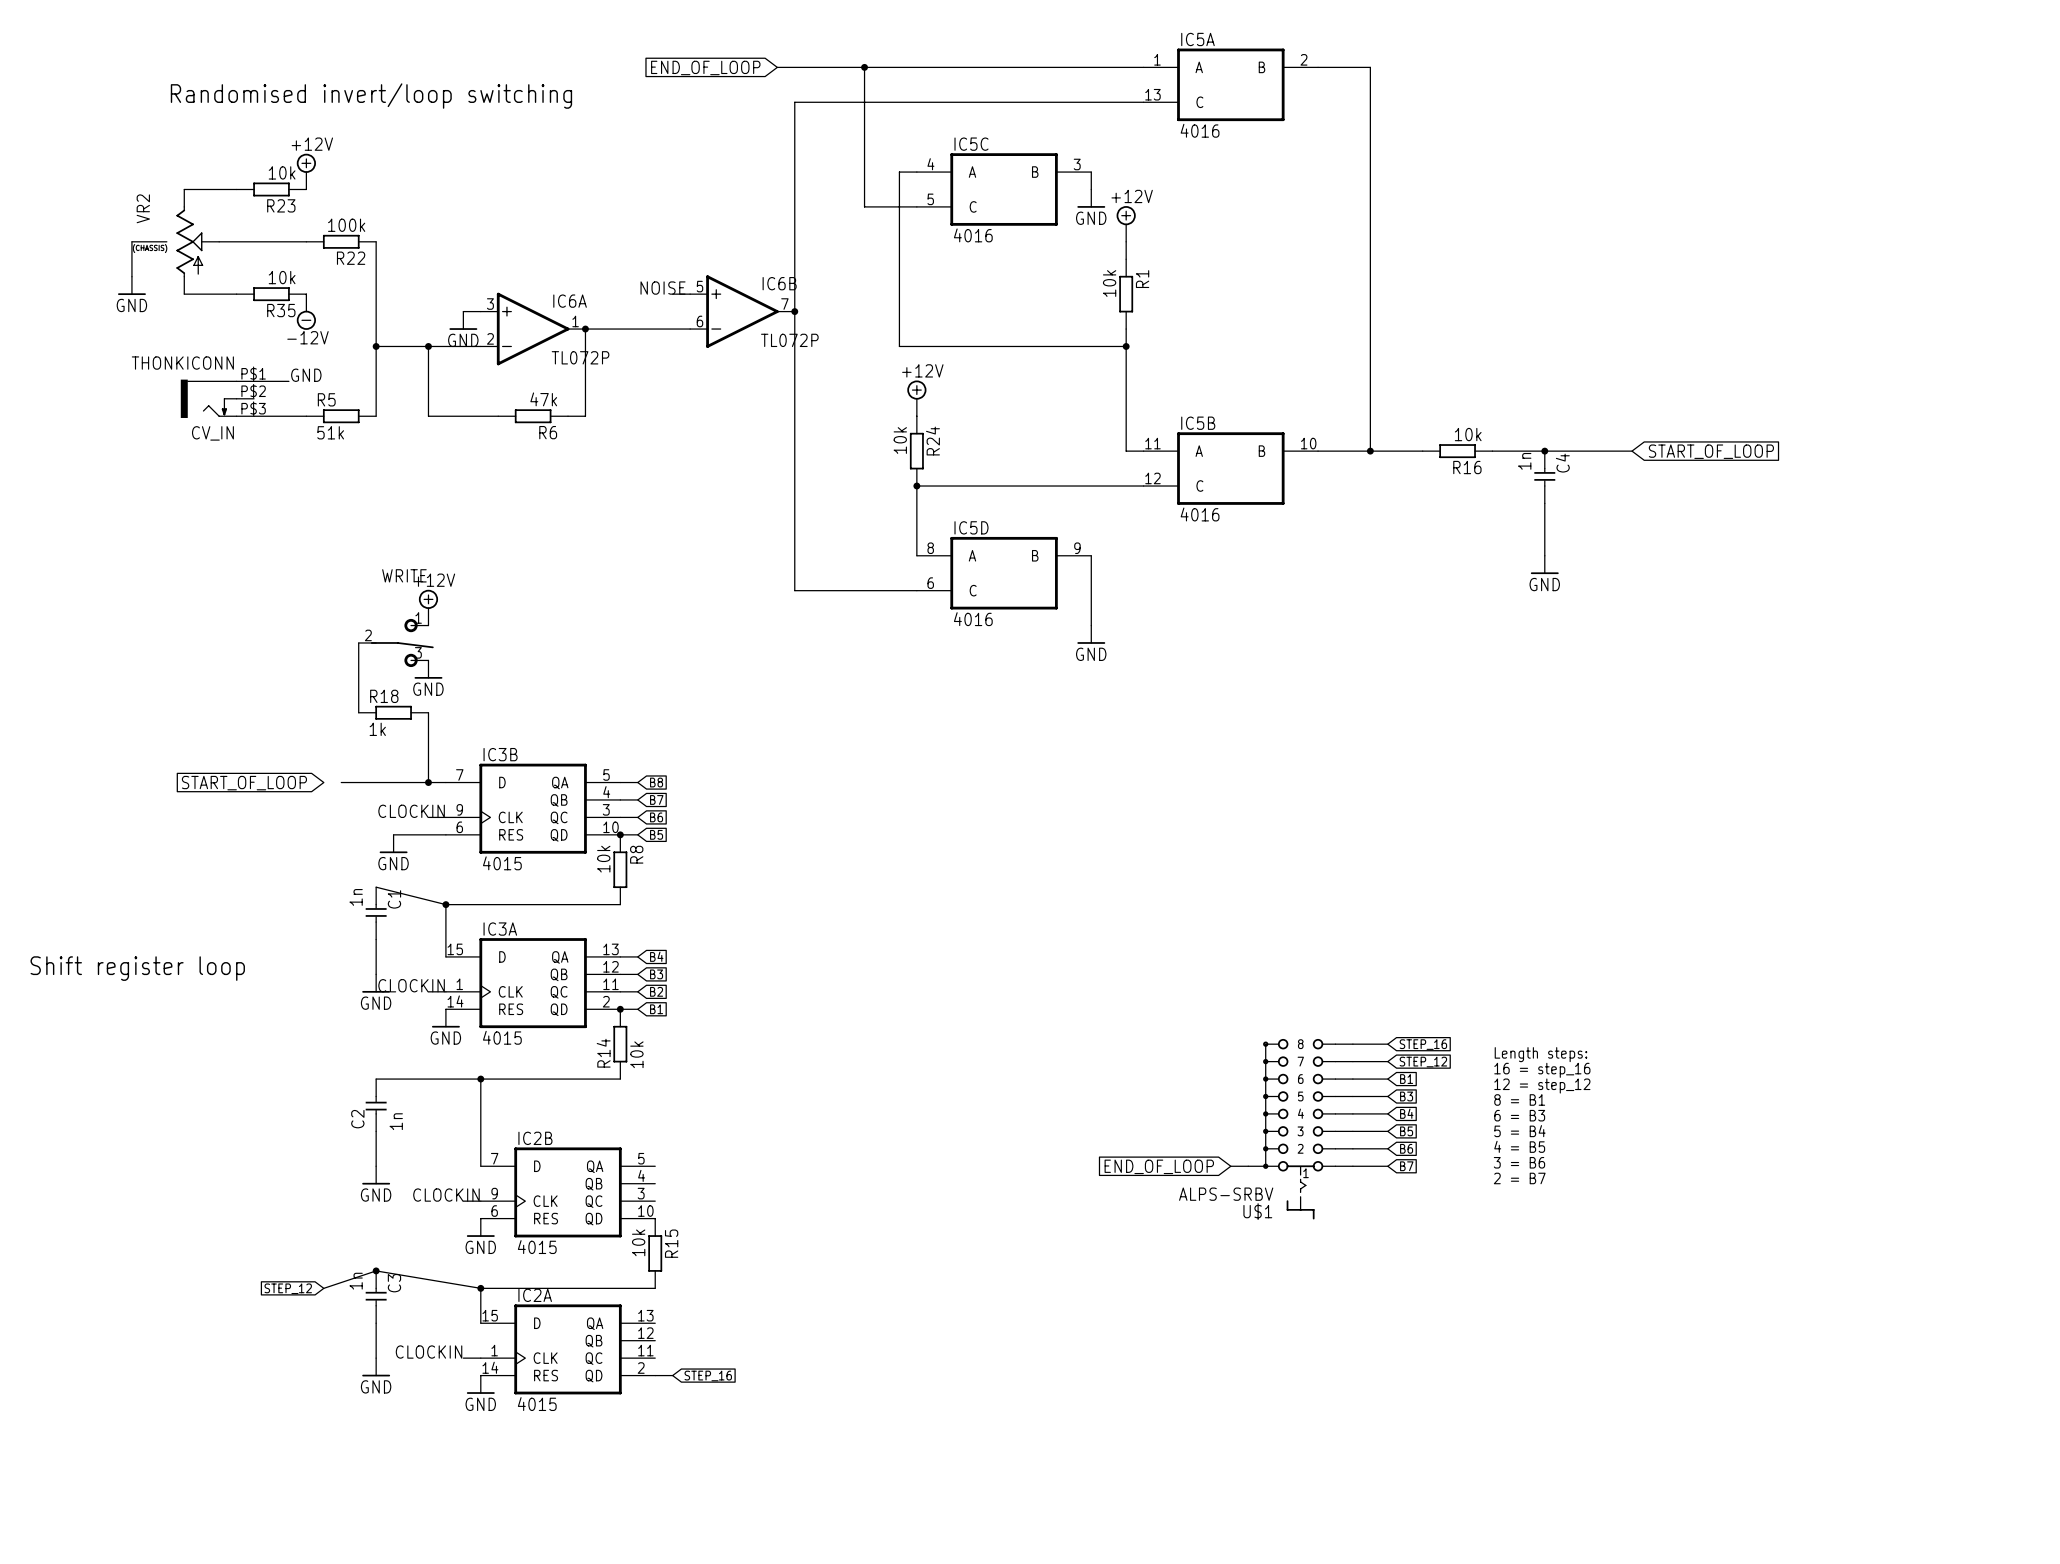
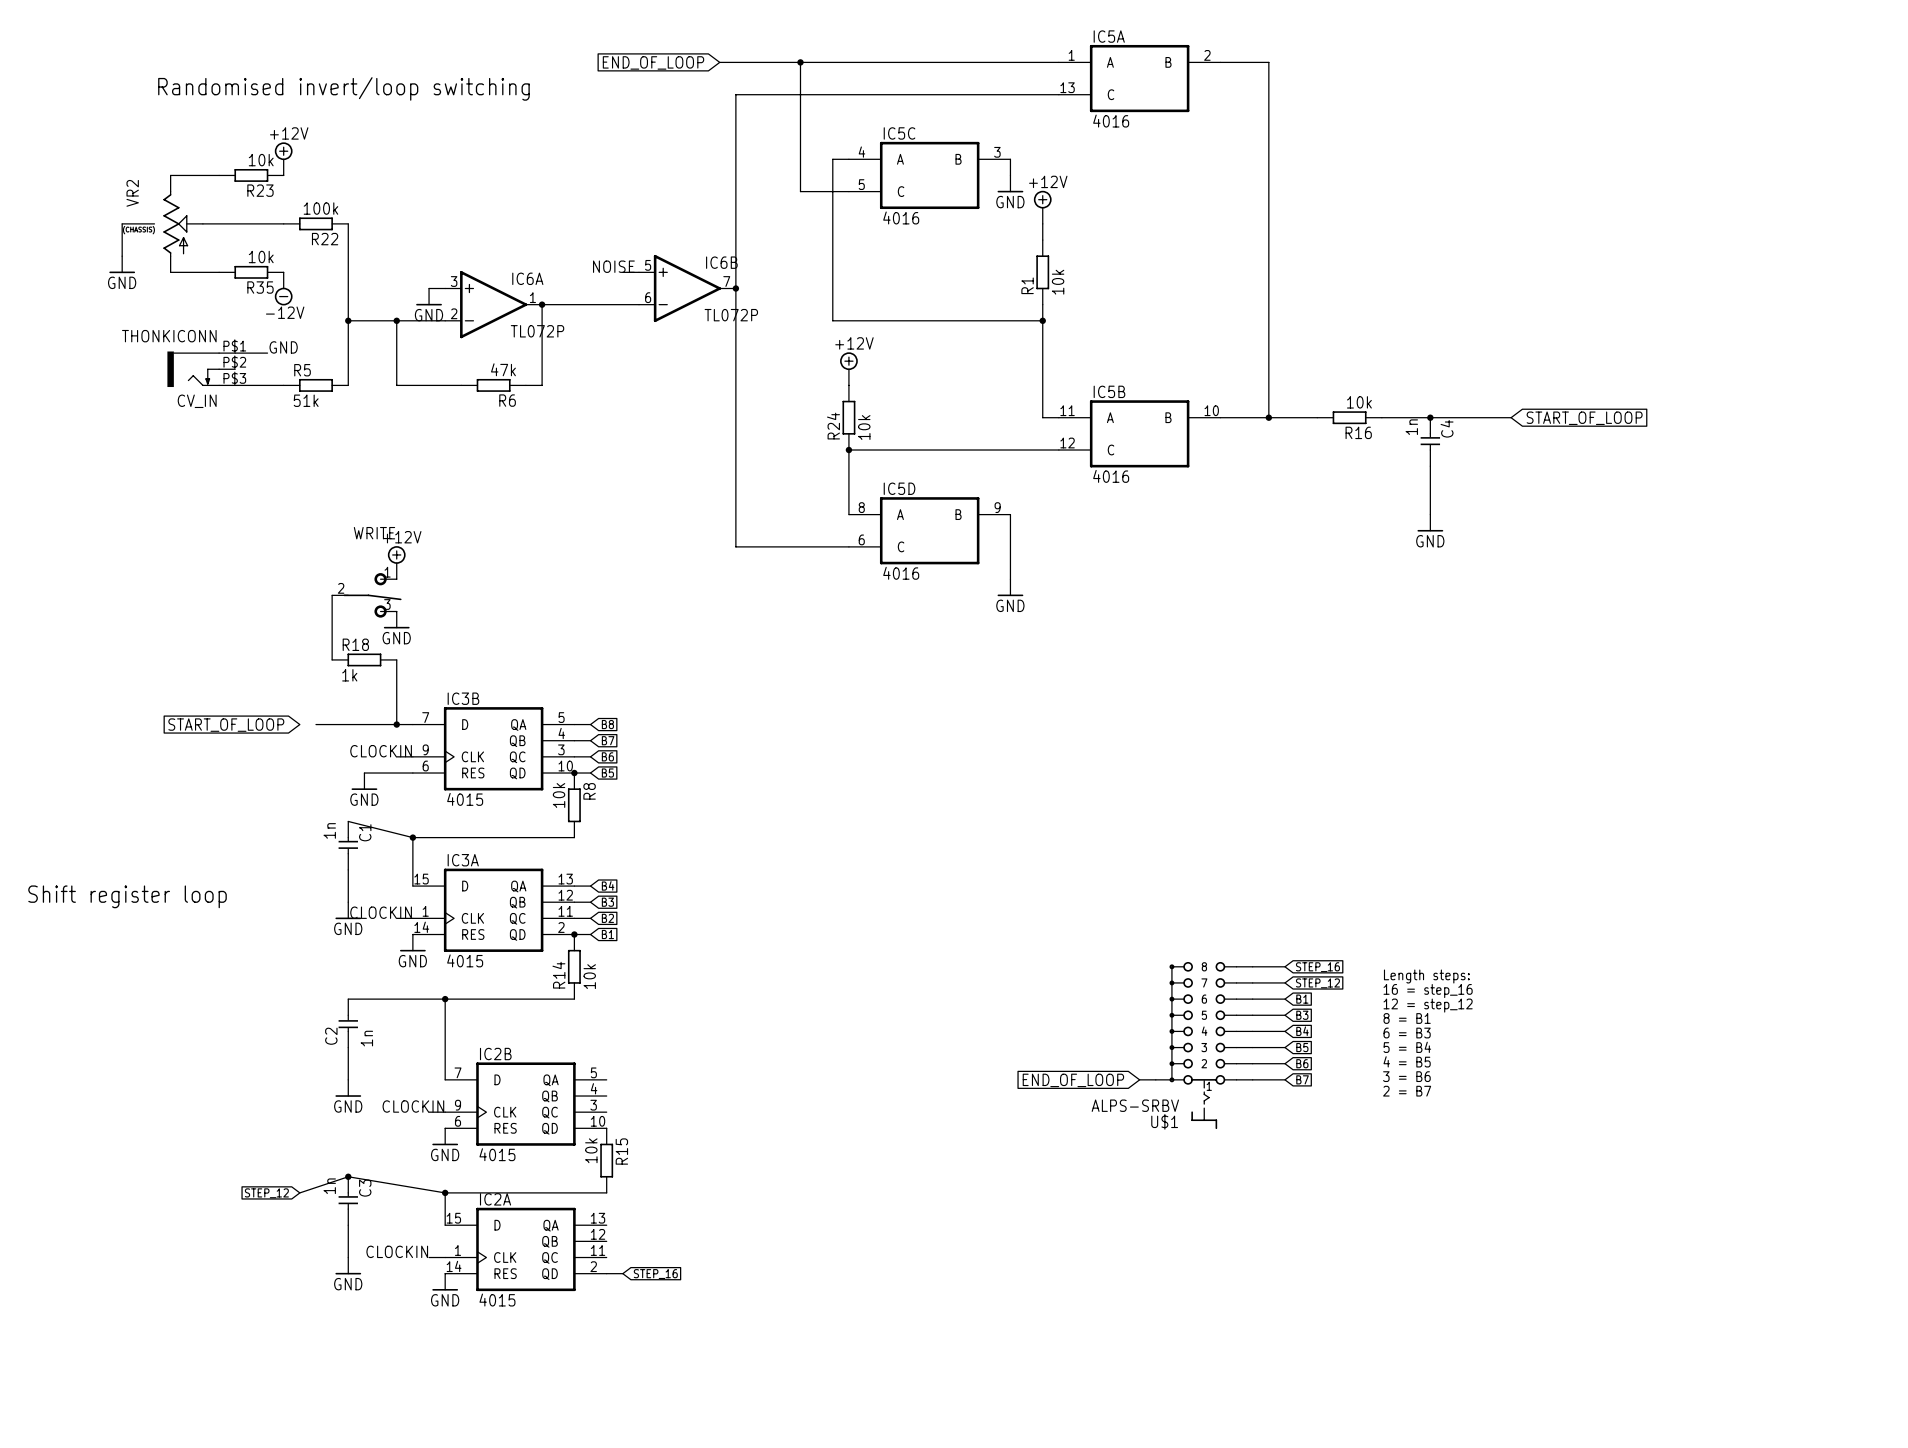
R1 name position: R1 (1142, 279) -> R1 (1027, 285)
R1 value position: 10k (1109, 283) -> 10k (1058, 282)
R24 value position: 10k (900, 440) -> 10k (864, 427)
R24 name position: R24 (932, 441) -> R24 (833, 426)

